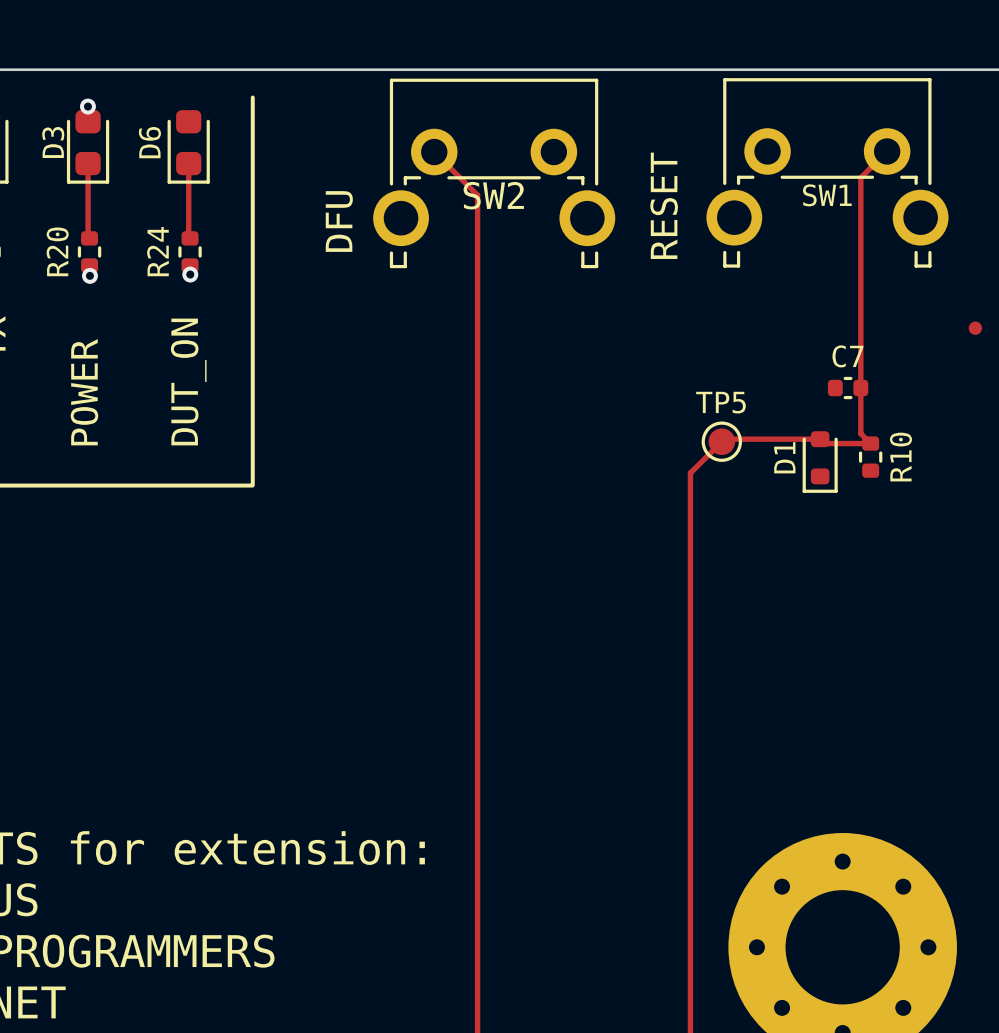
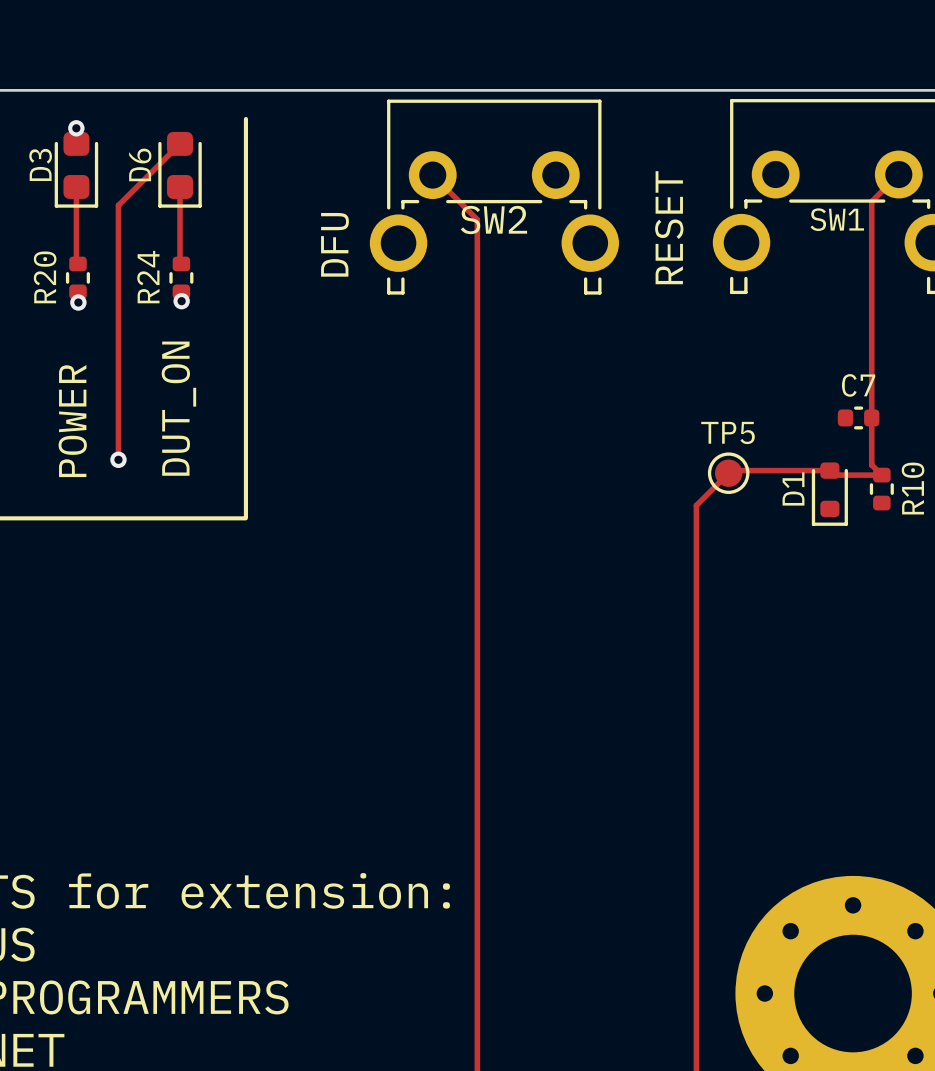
track: none -> (180, 143) (118, 205) (118, 459)
via: none -> (118, 459)

